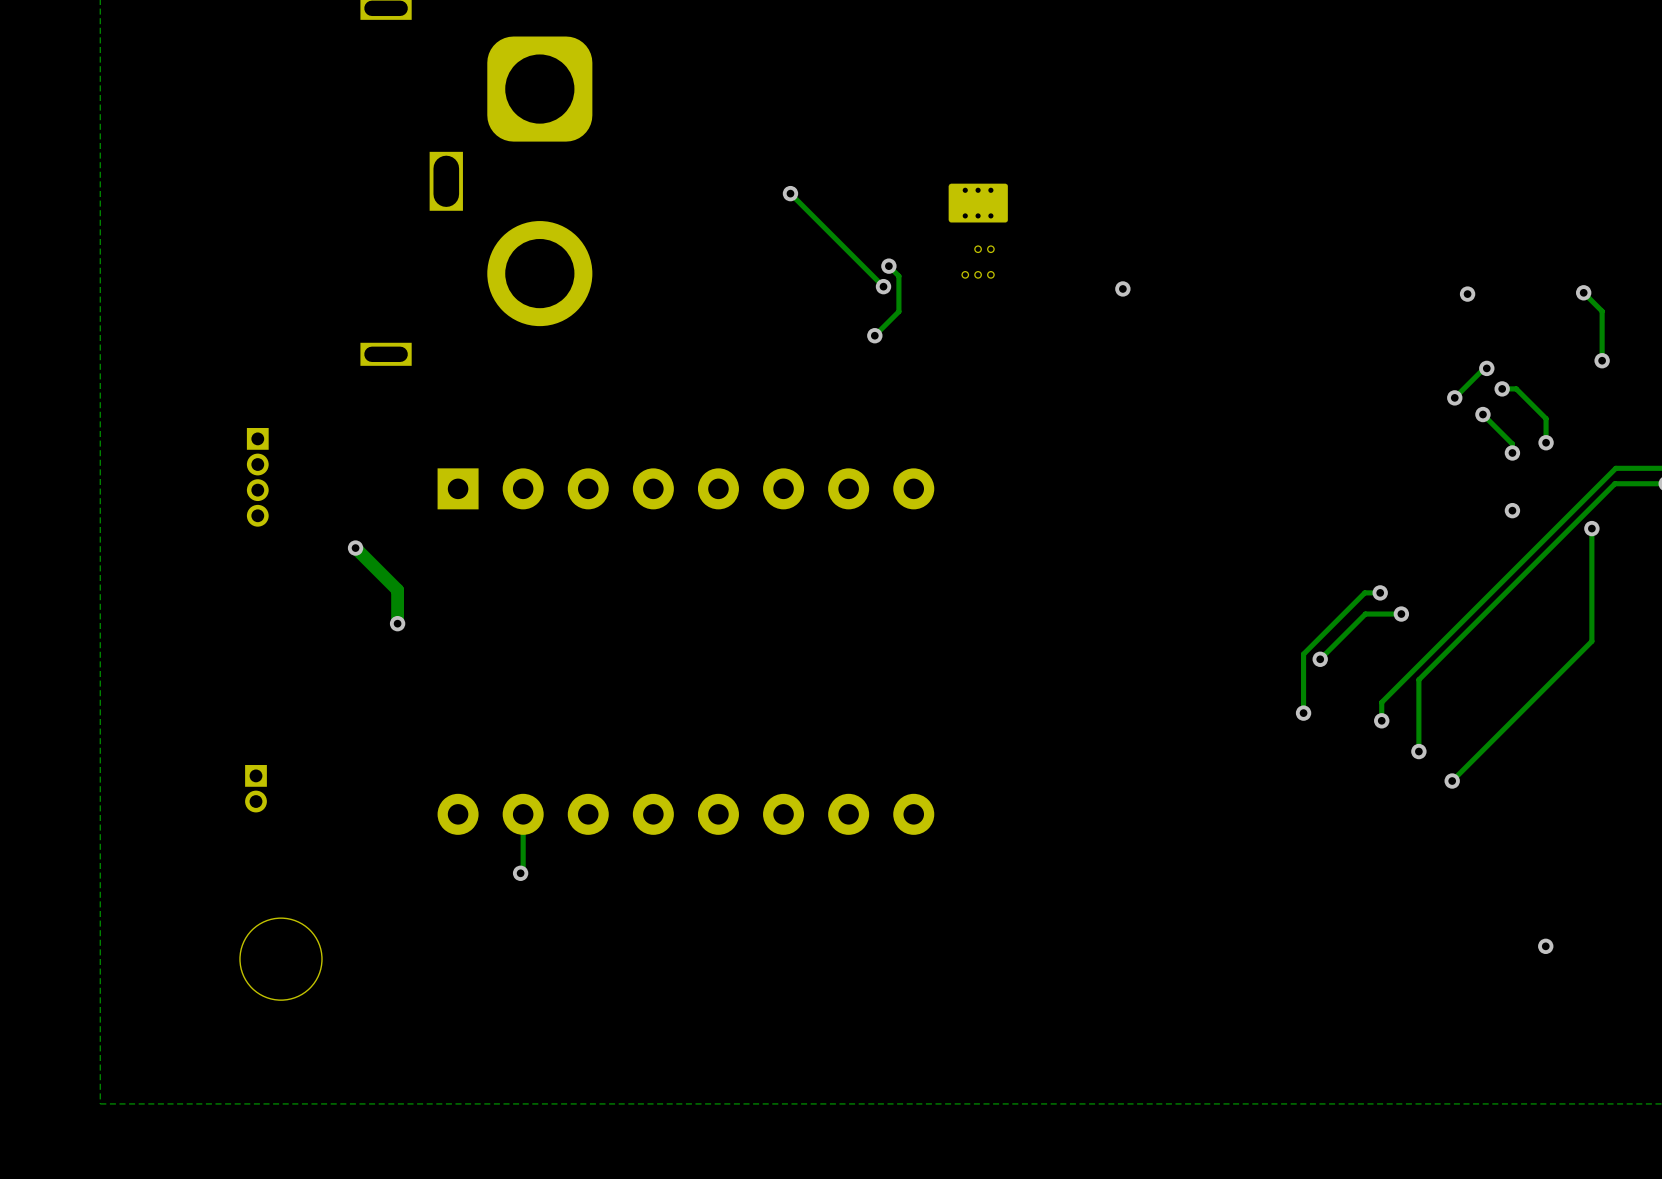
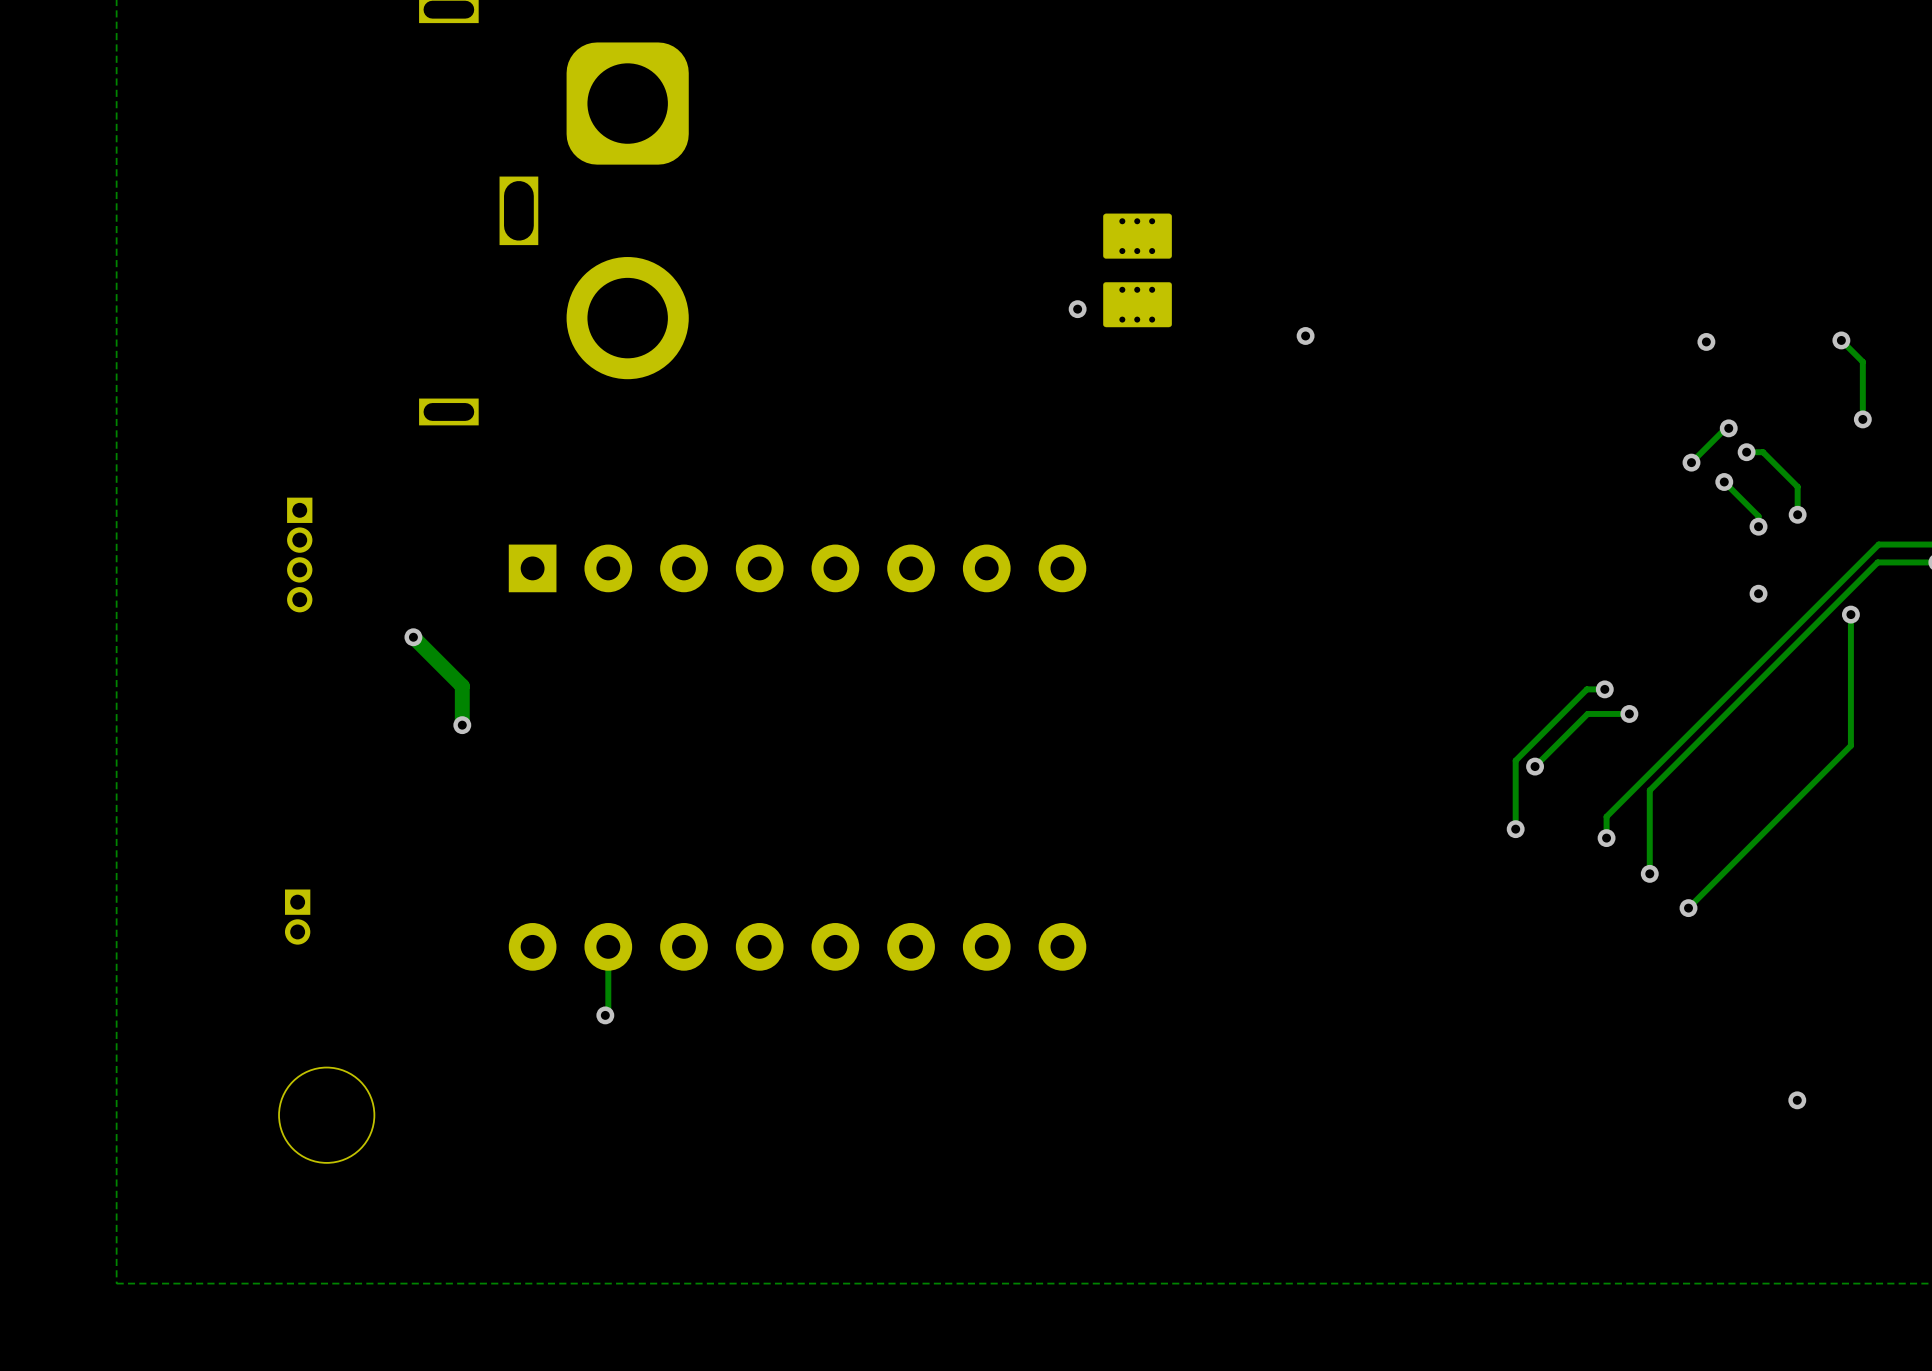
part footprint: [948, 183, 1008, 279] -> [1103, 213, 1172, 328]
track: (790, 193) (883, 286) -> none
via: (790, 193) -> none
via: none -> (1077, 309)
track: (888, 266) (898, 276) (898, 311) (874, 335) -> none
via: (888, 266) -> none
via: (883, 286) -> none
via: (874, 335) -> none

